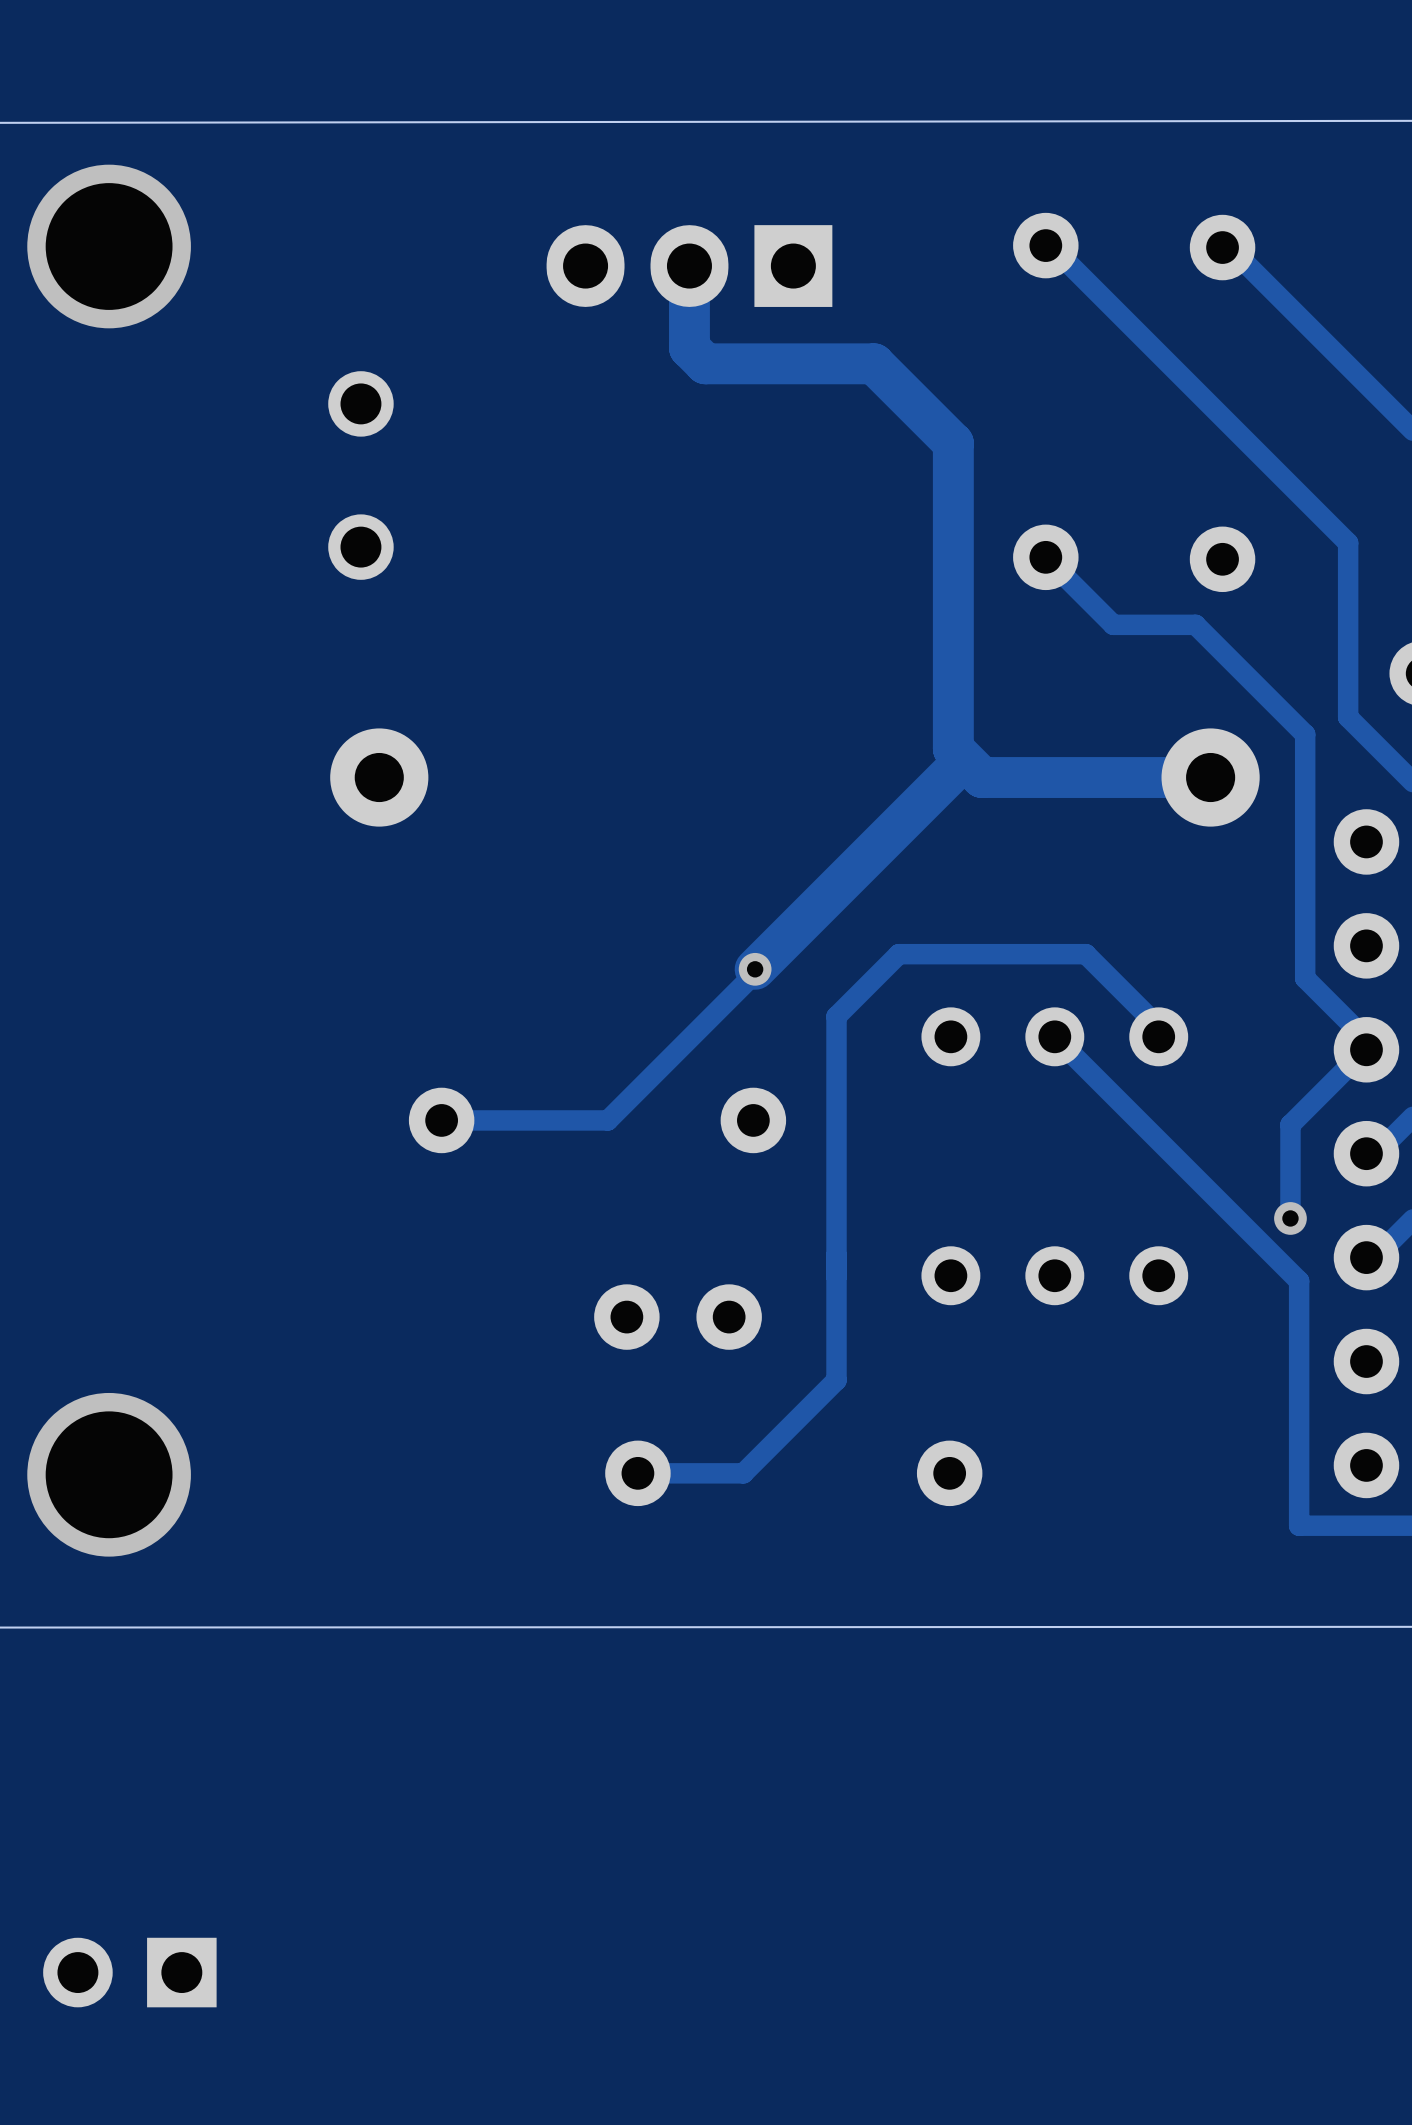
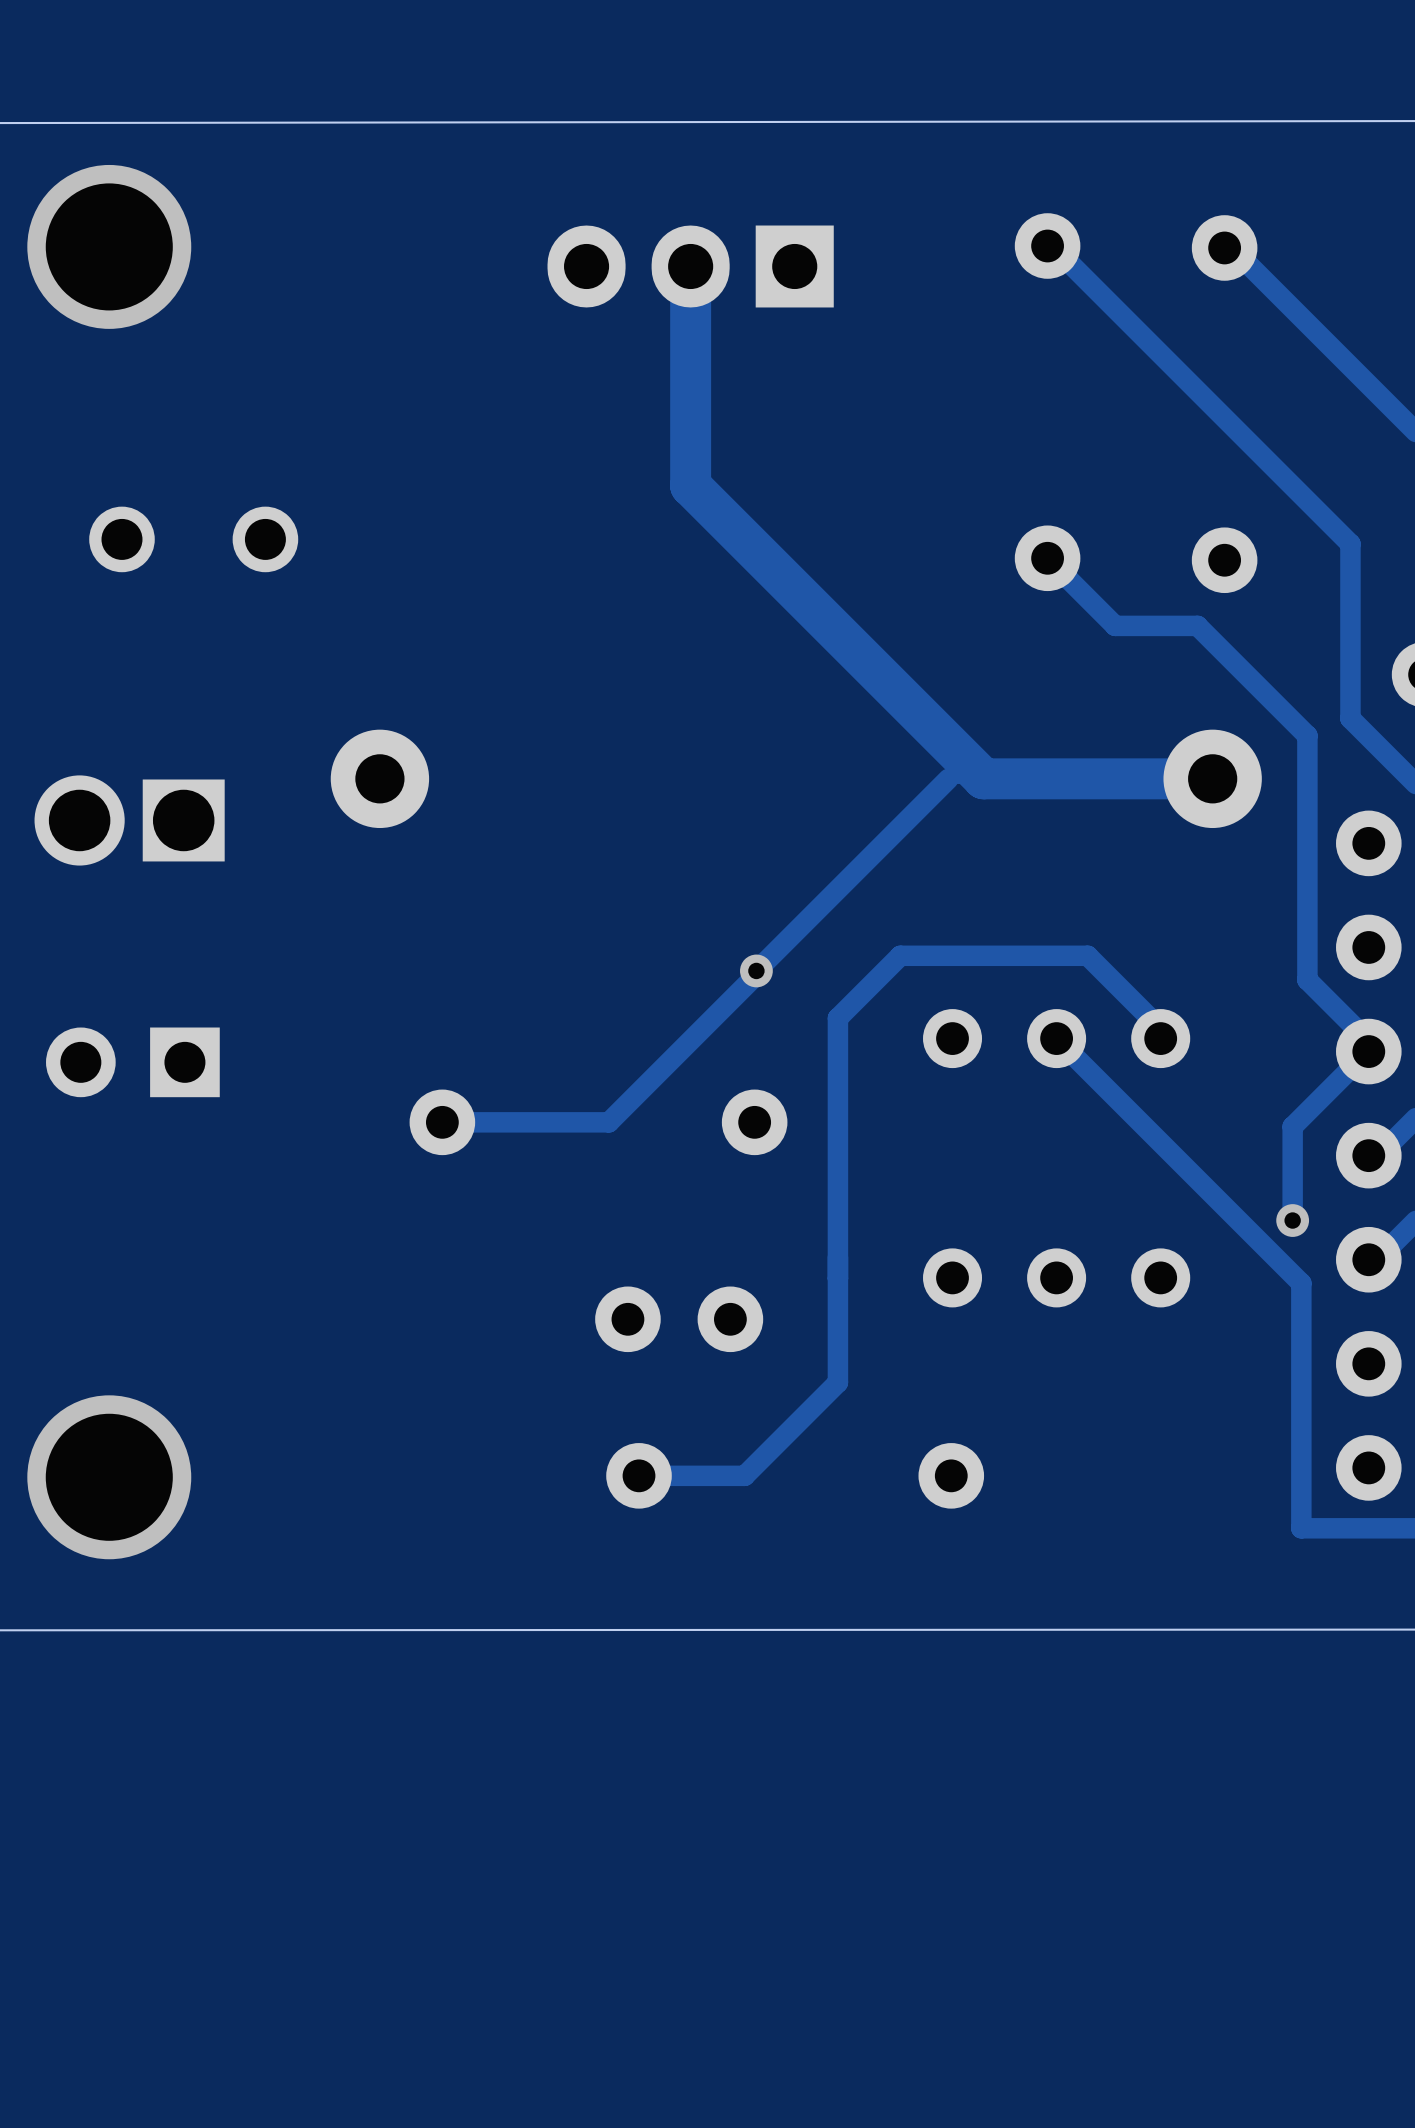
track: (689, 347) (705, 363) (873, 363) (953, 443) (953, 771) (946, 777) -> (690, 348) (690, 485) (954, 750)
part rotation: 0° (360, 475) -> 90° clockwise (193, 539)
part position: (360, 475) -> (193, 539)
track width: thick (946, 777) (755, 969) -> thin (948, 778) (756, 970)
part: none -> (129, 820)
part position: (129, 1972) -> (132, 1062)

